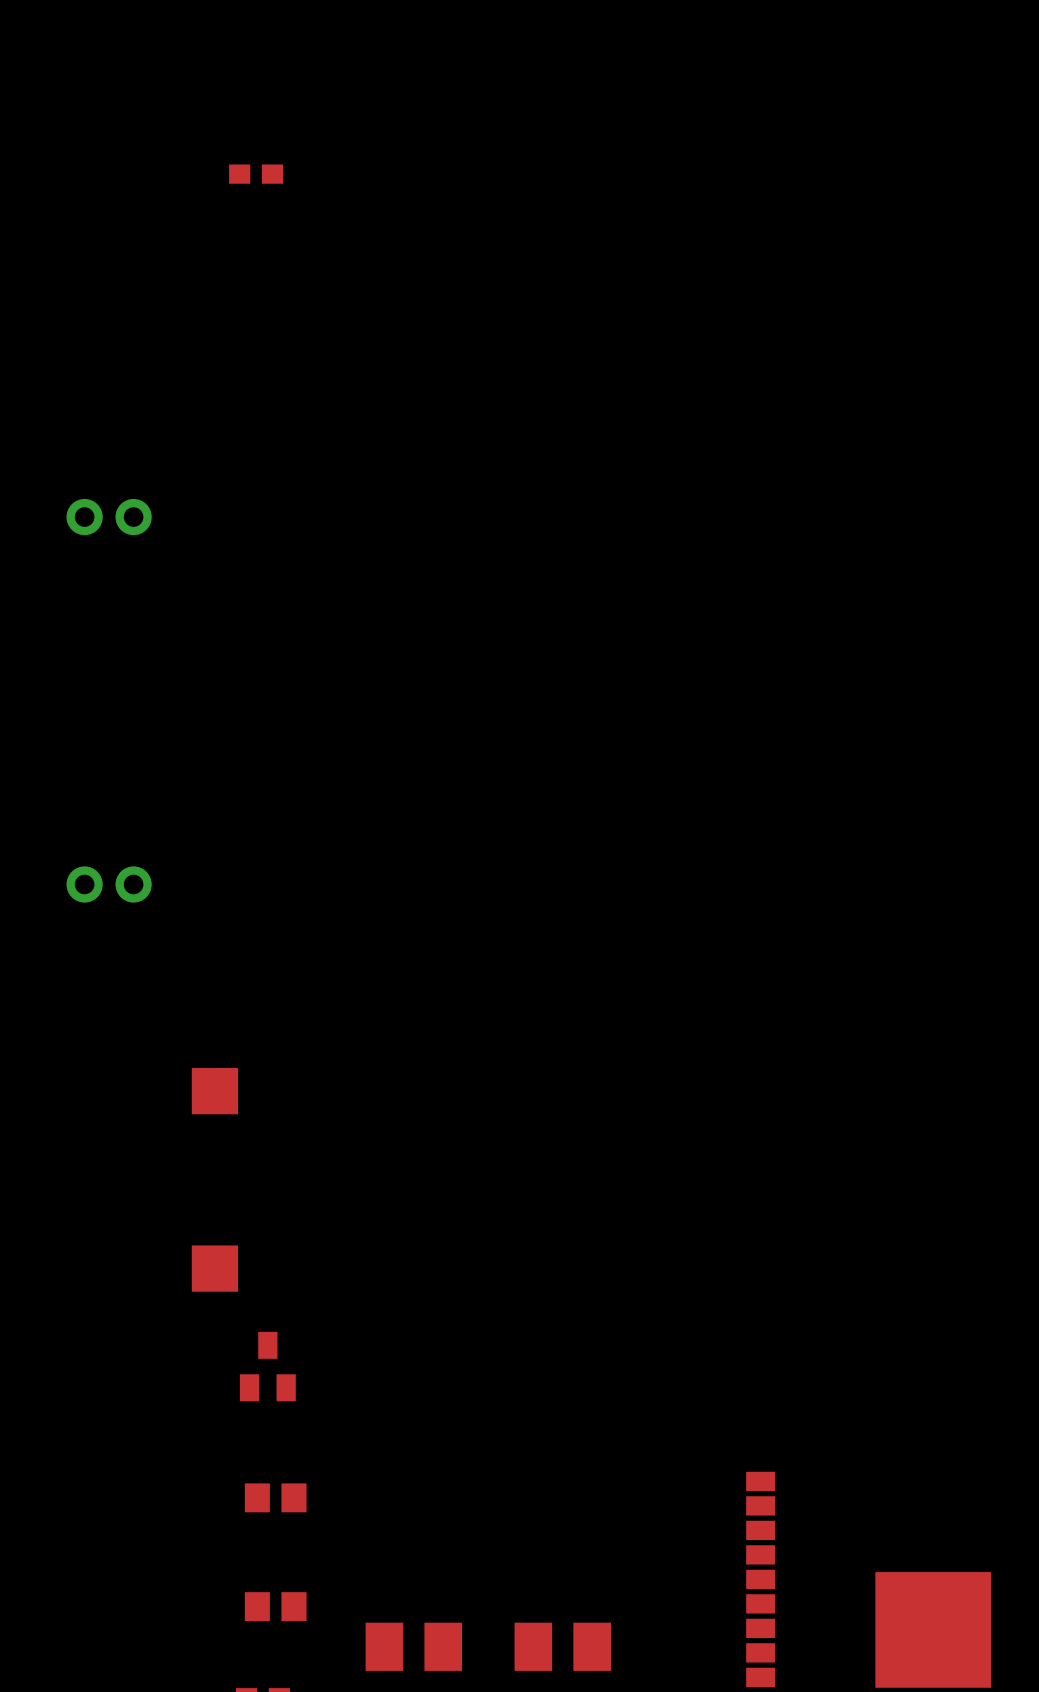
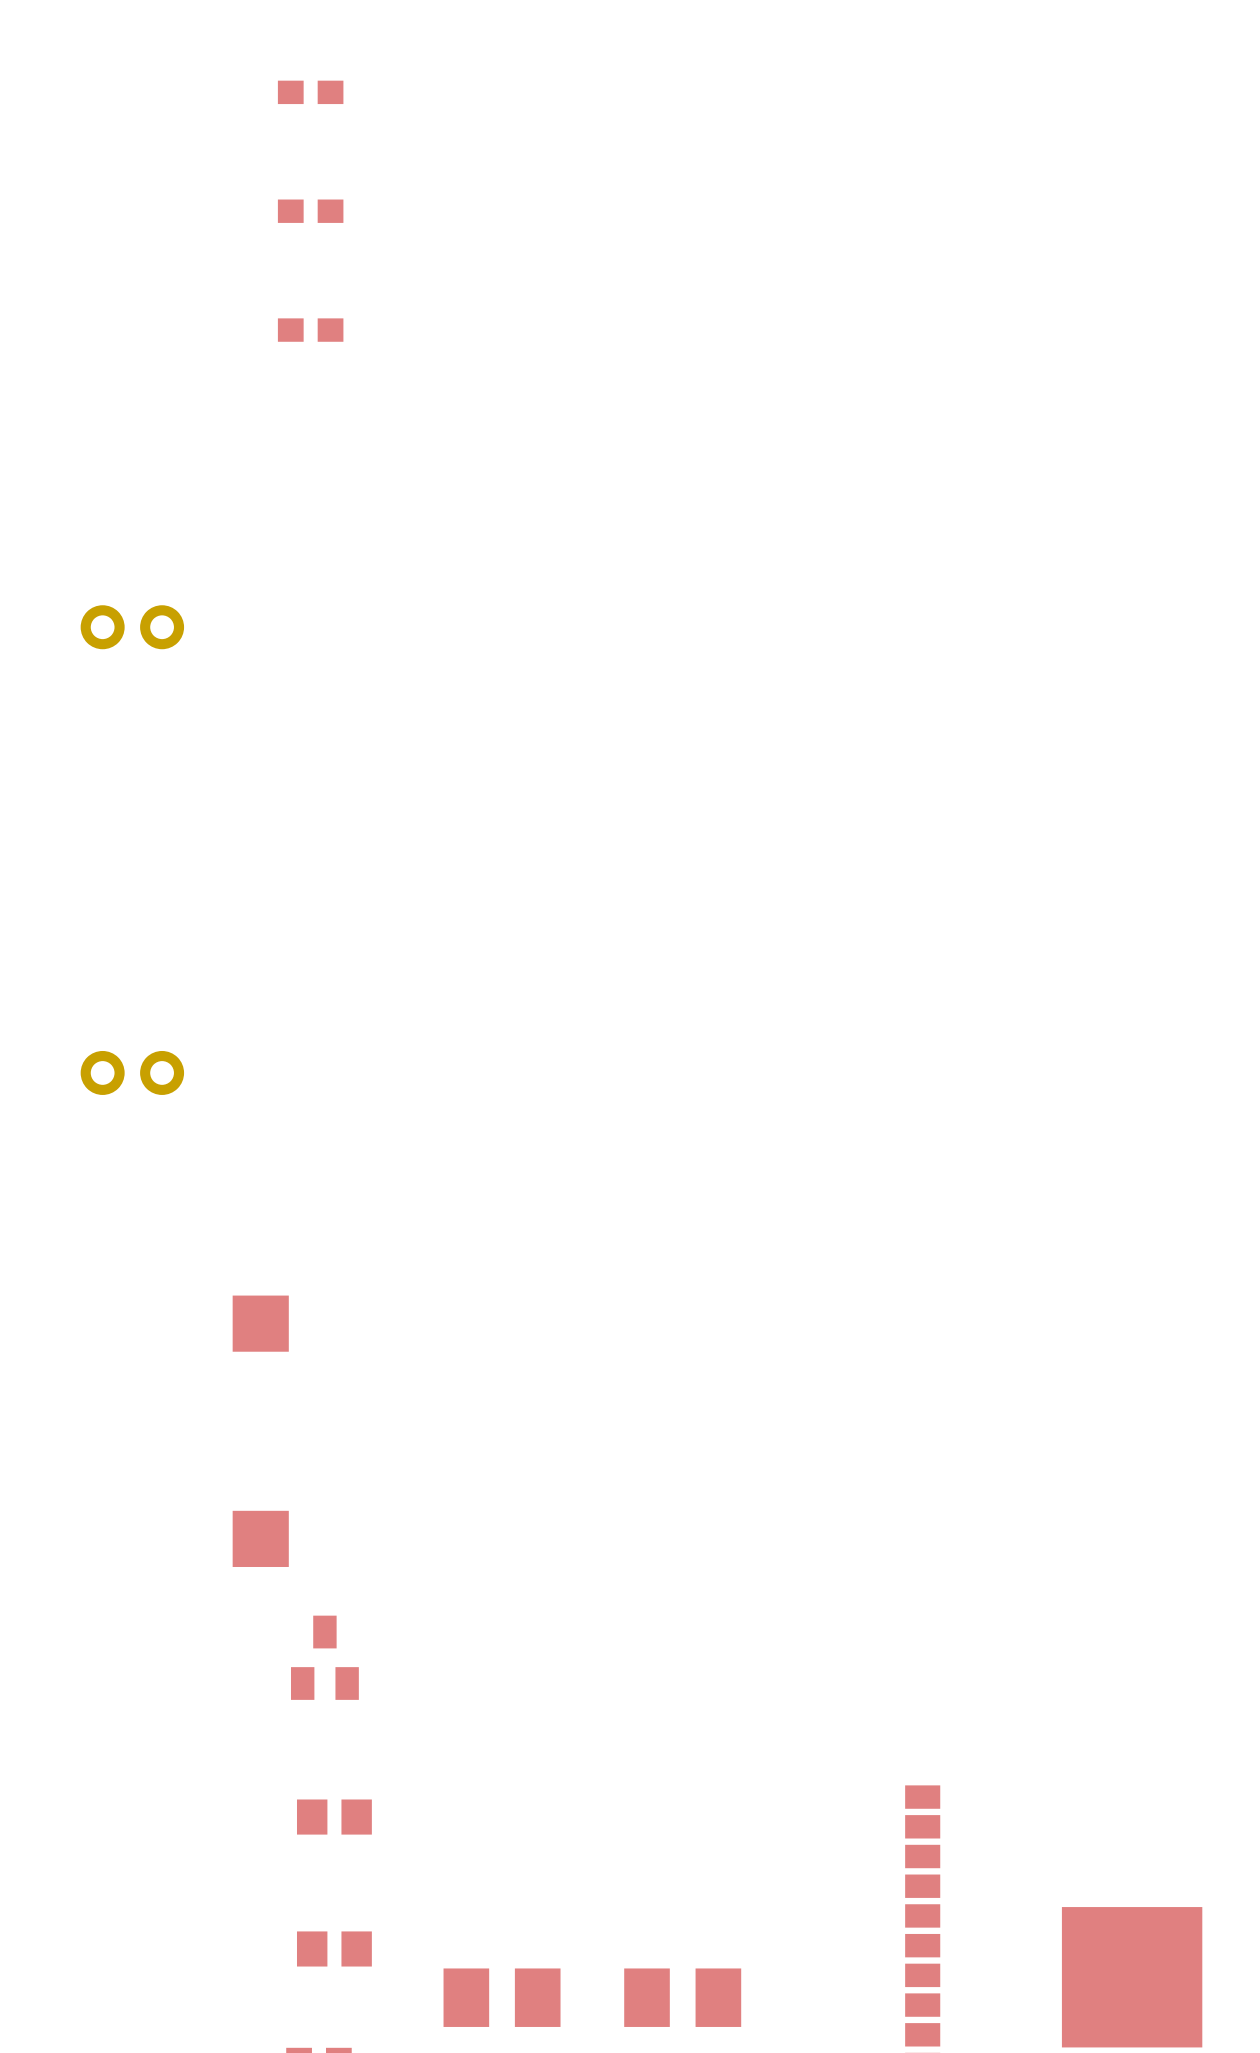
part: none -> (310, 92)
part: none -> (310, 330)

